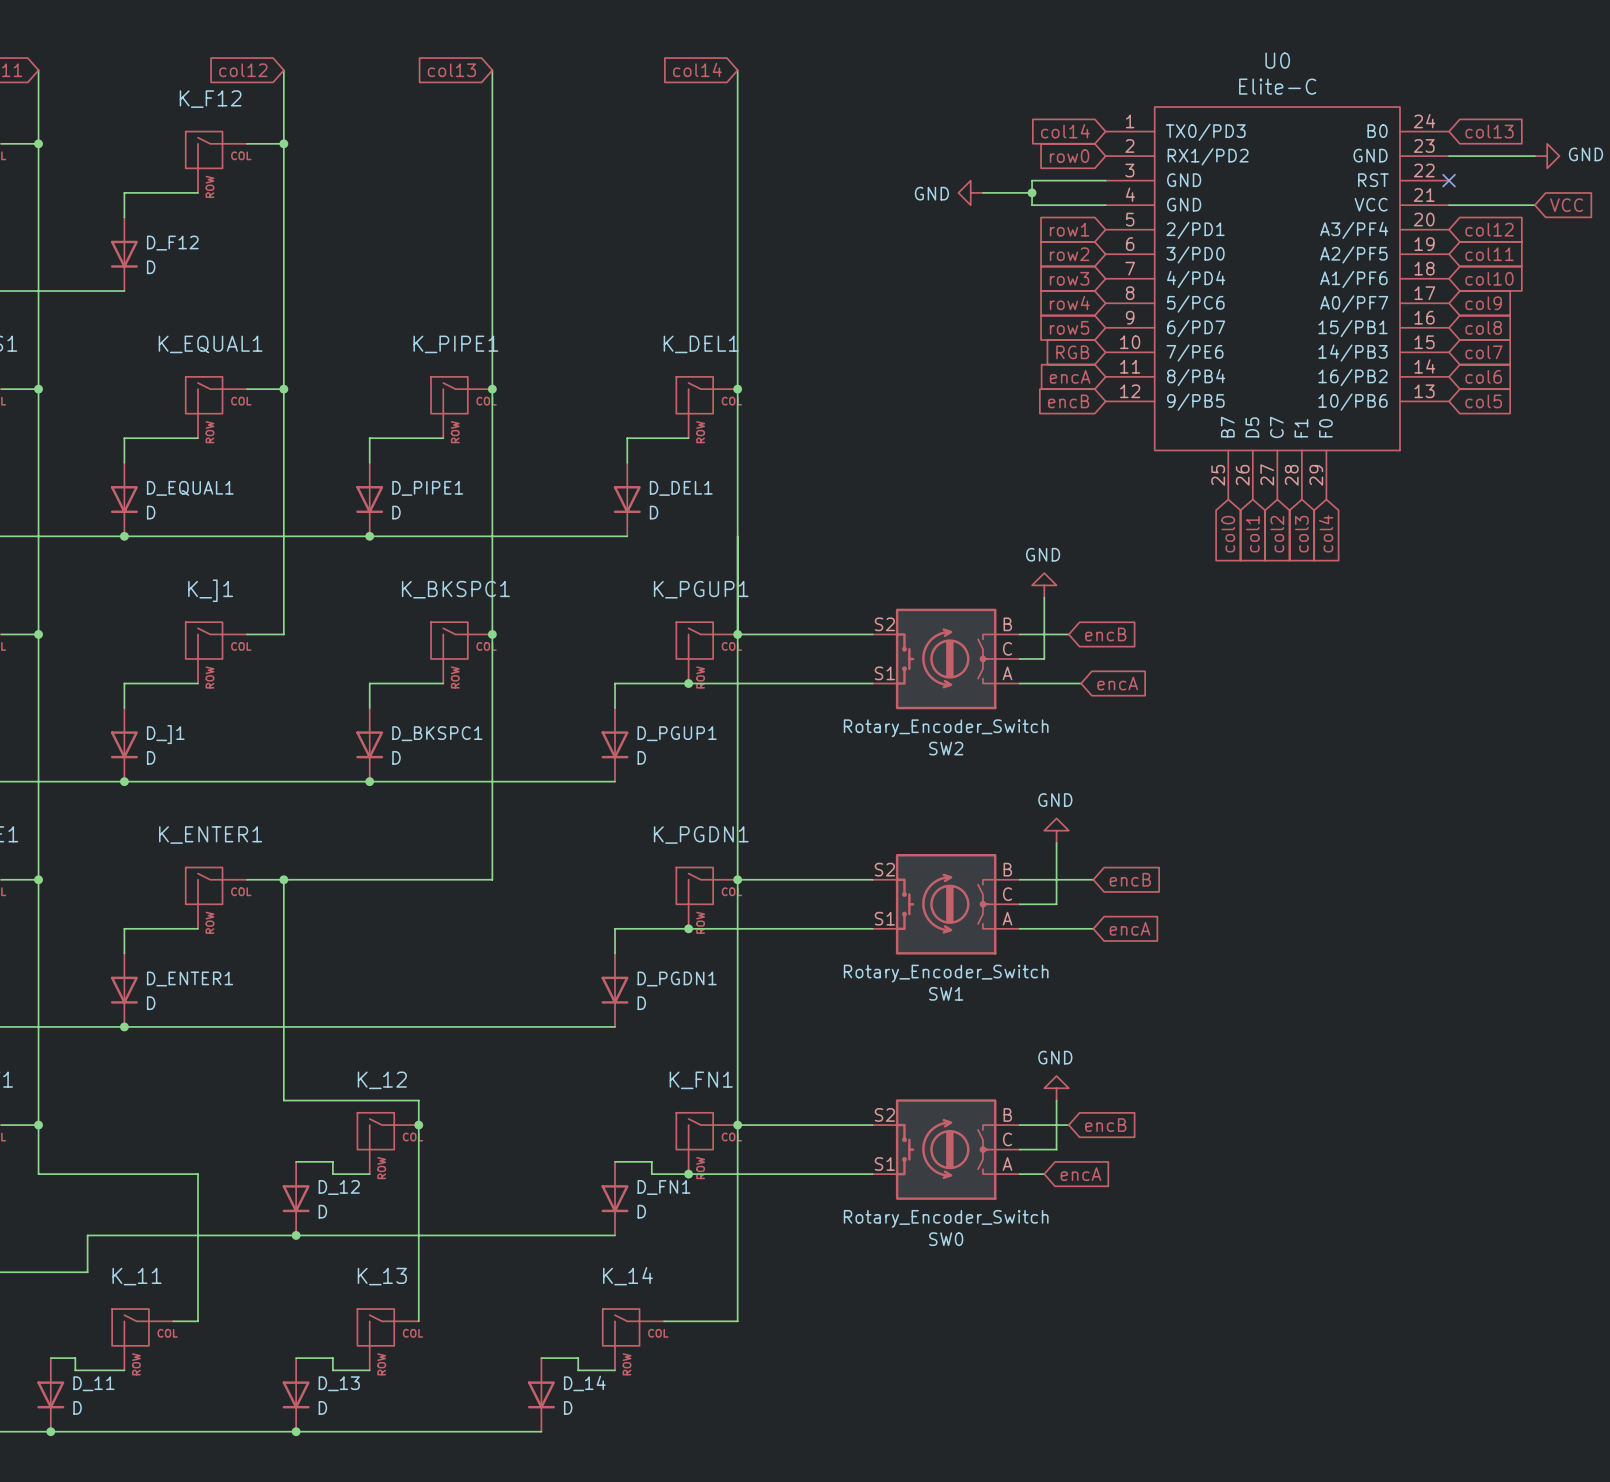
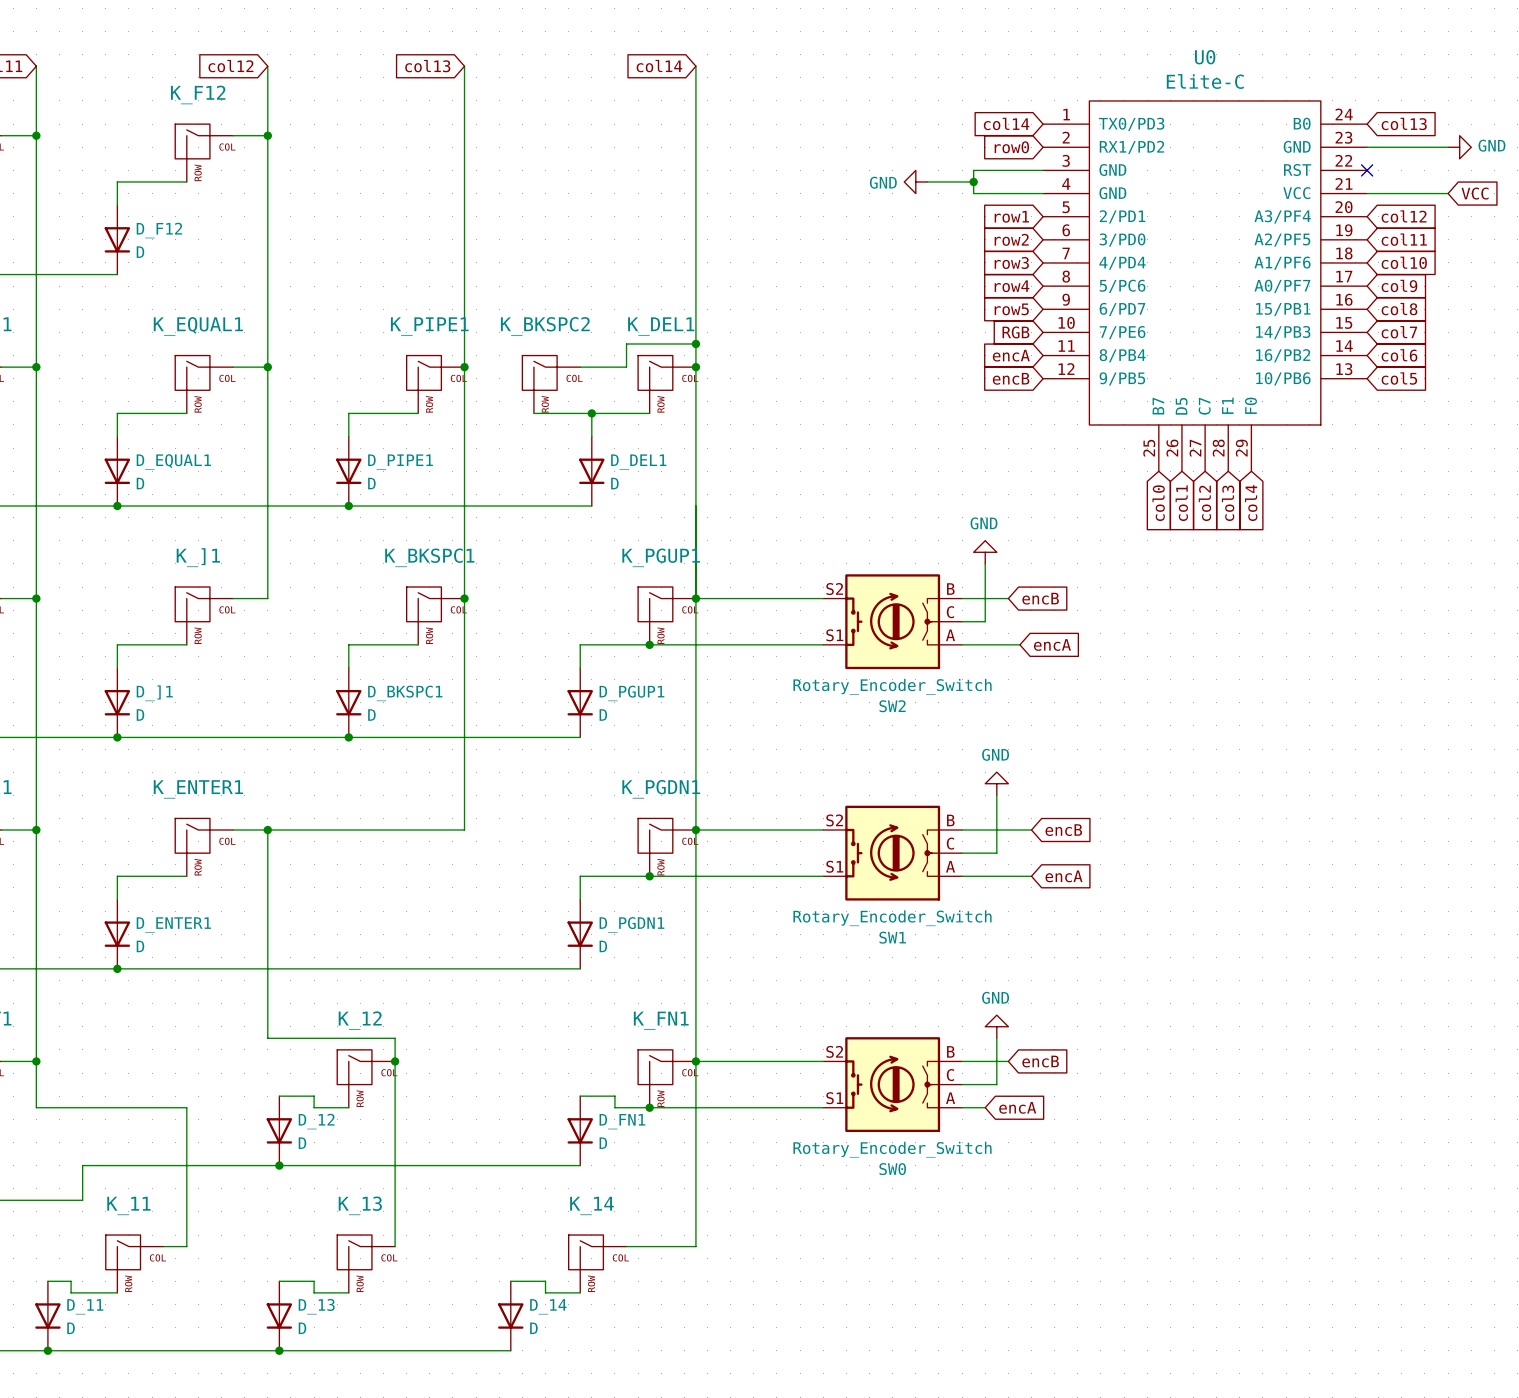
wire: none -> (695, 343) (626, 343) (626, 367) (580, 367)
junction: none -> (695, 343)
K_BKSPC2: none -> (551, 384)
wire: none -> (533, 413) (591, 413)
junction: none -> (591, 413)

